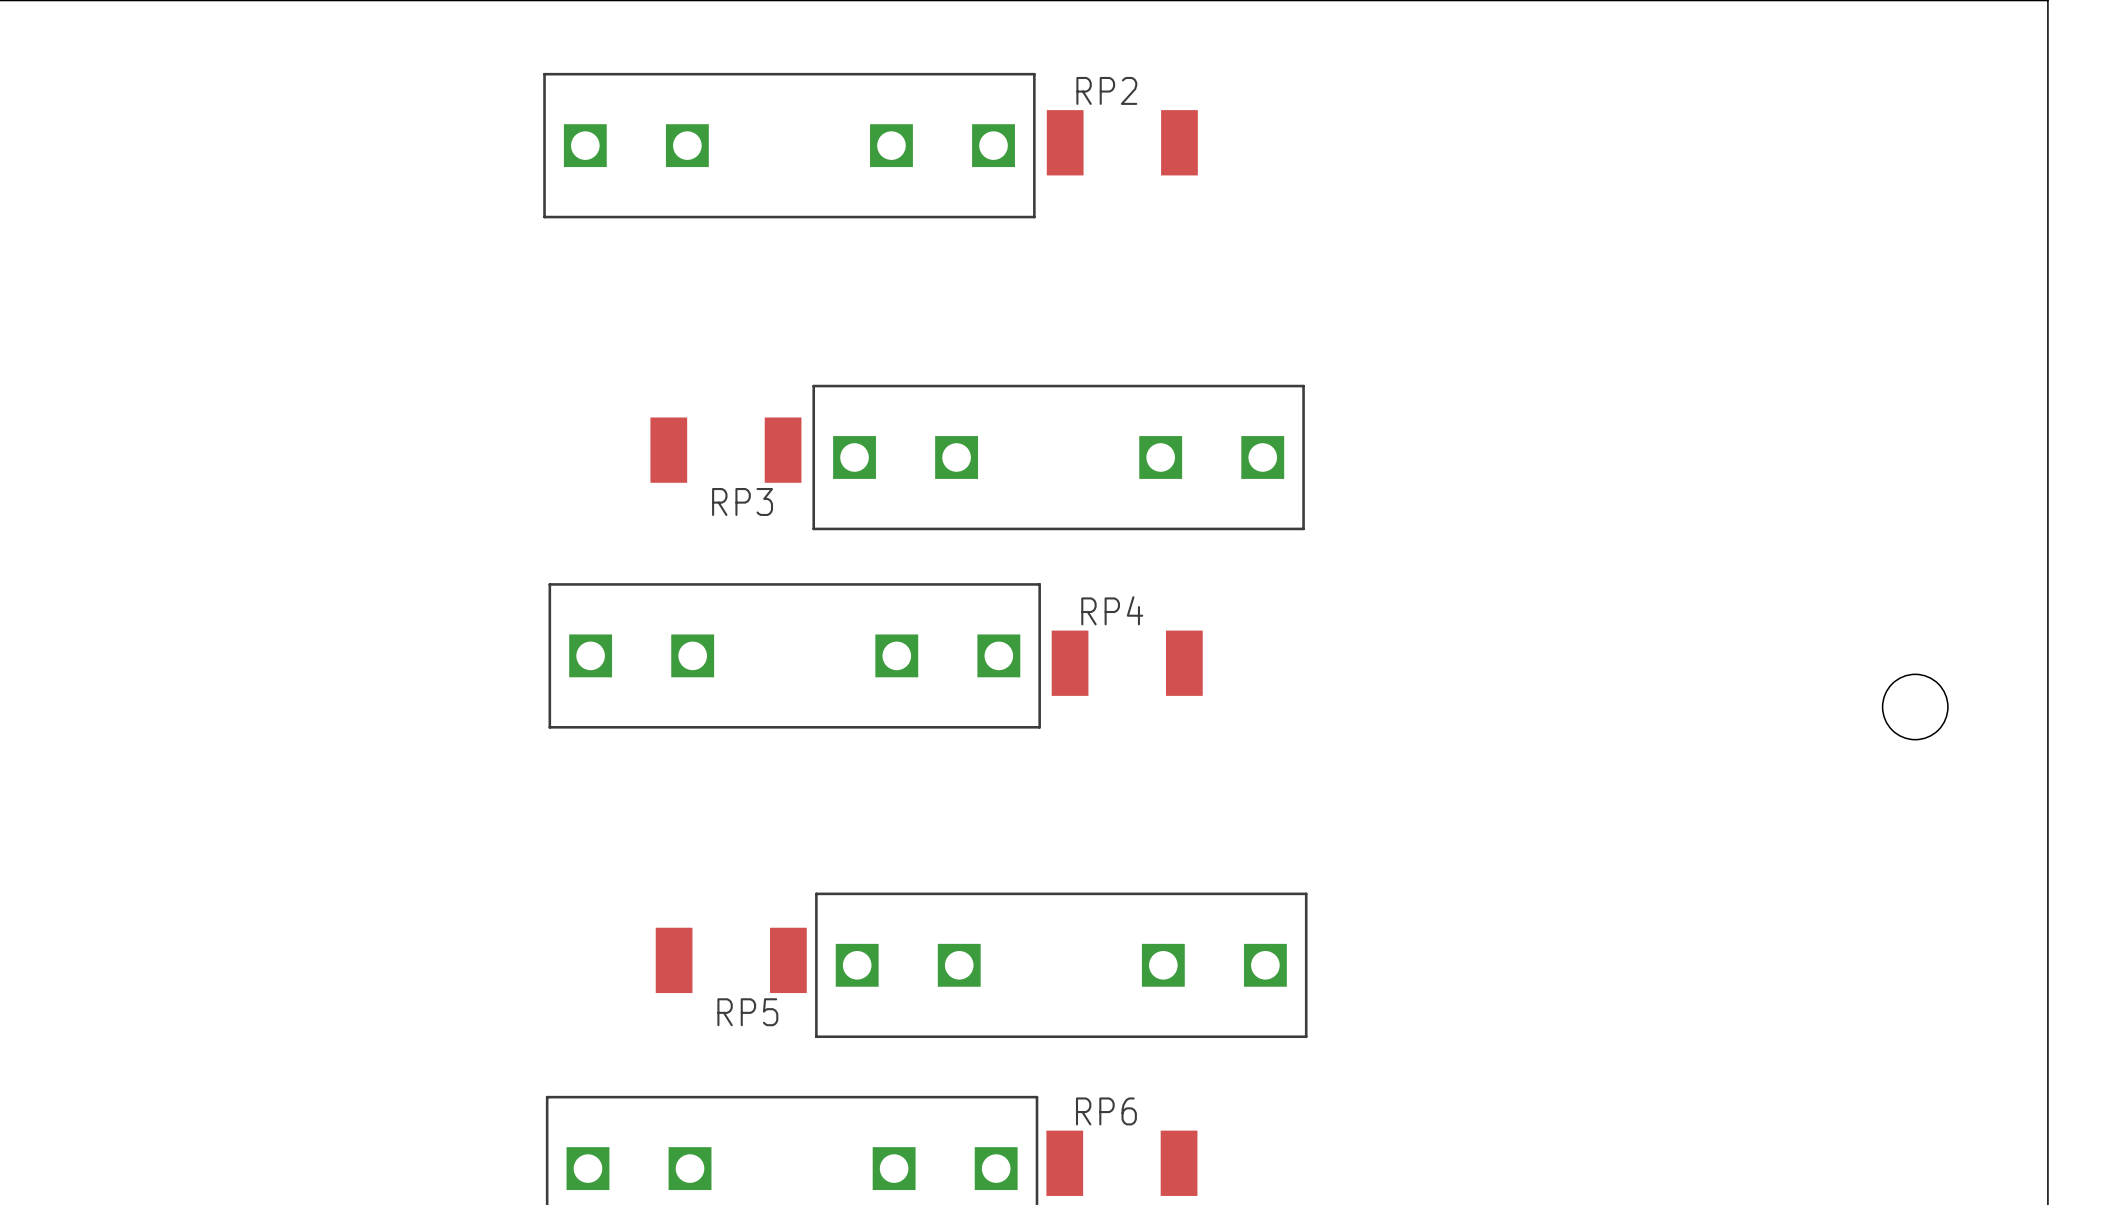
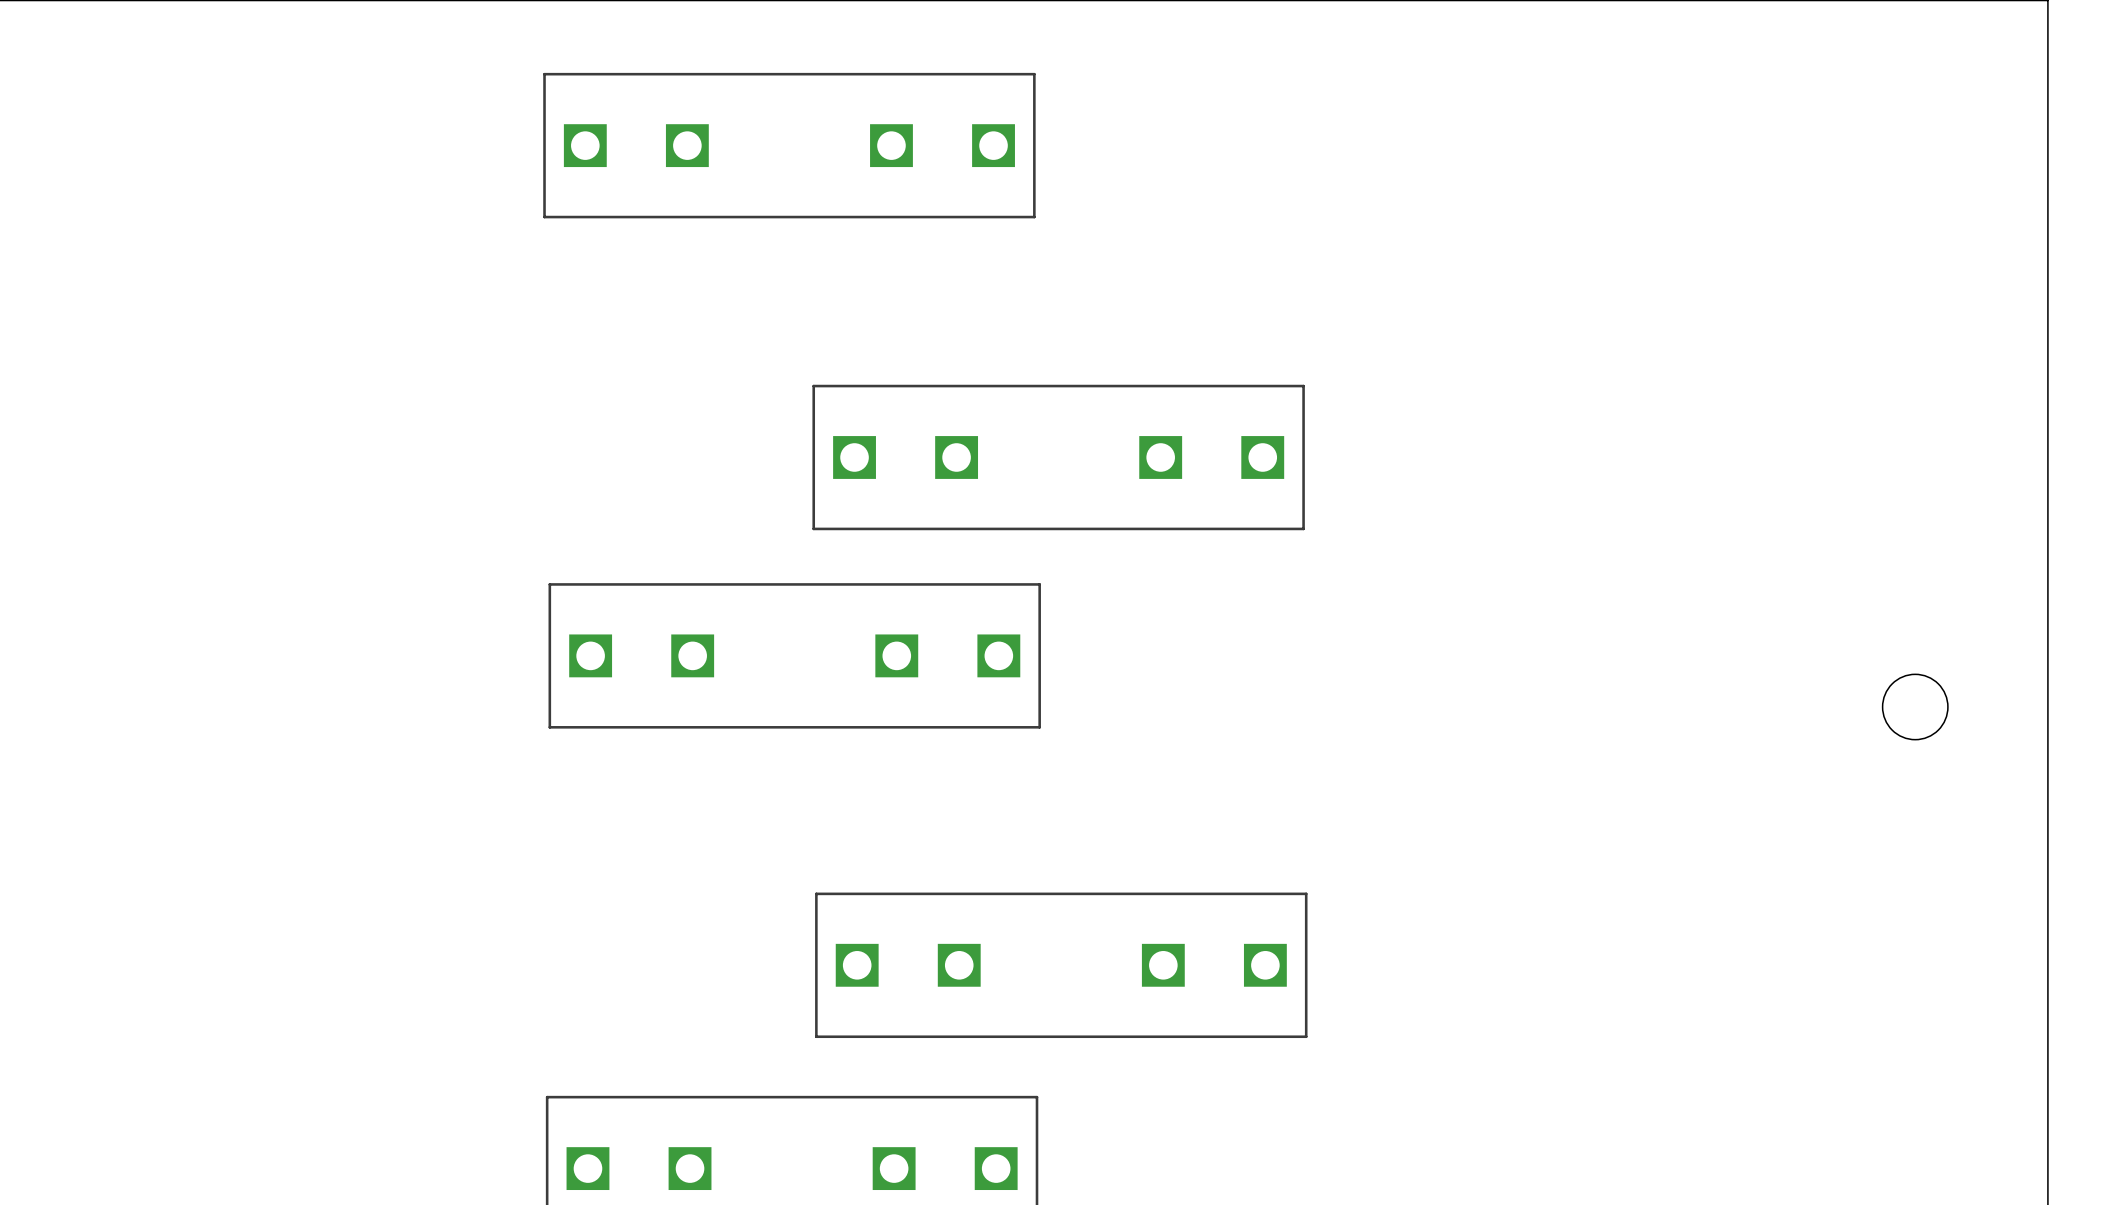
RP2: (1122, 142) -> none
RP3: (725, 450) -> none
RP4: (1127, 663) -> none
RP5: (731, 960) -> none
RP6: (1121, 1163) -> none

